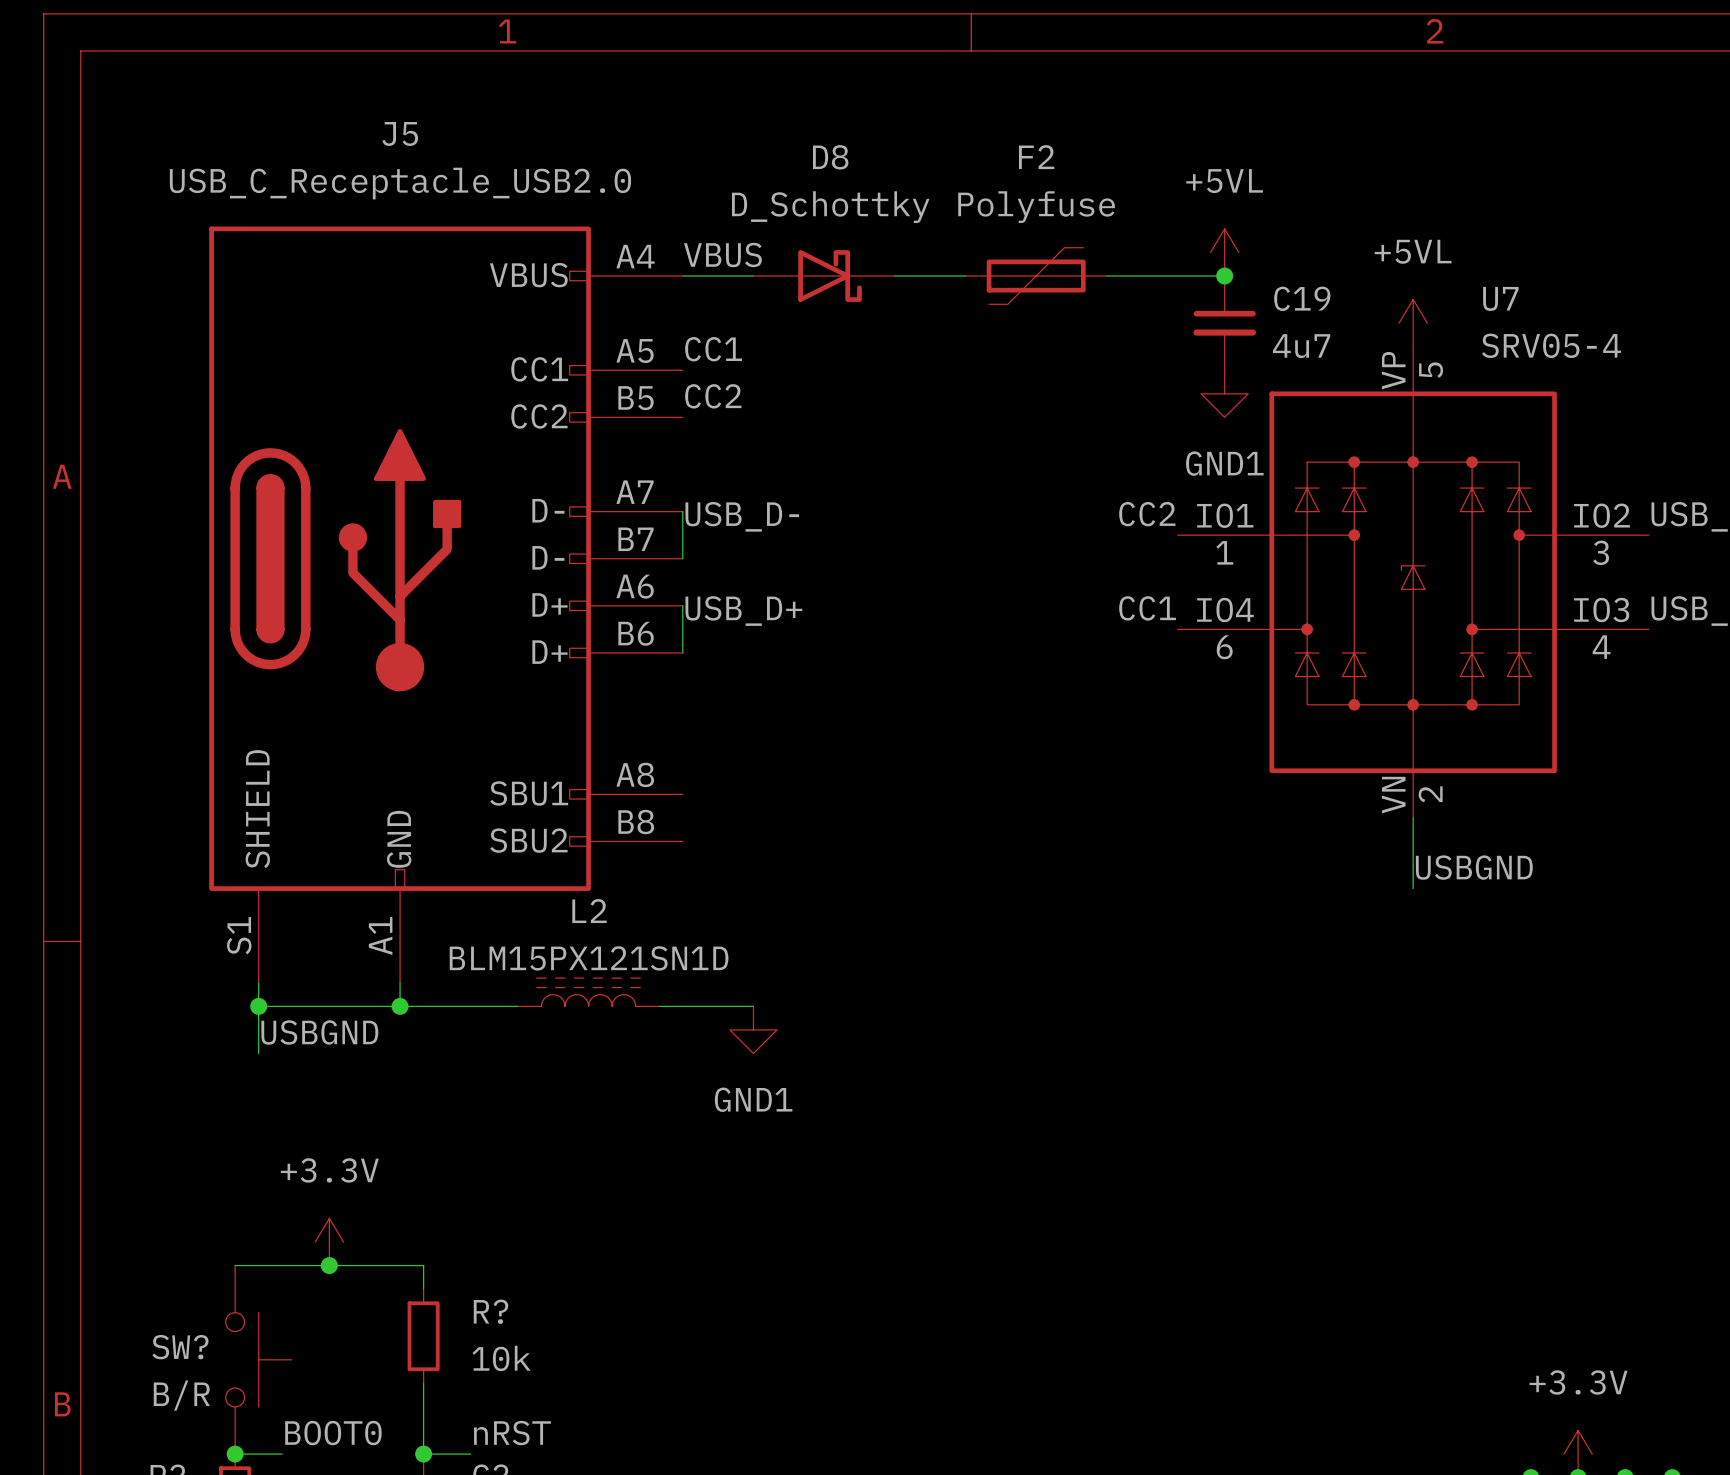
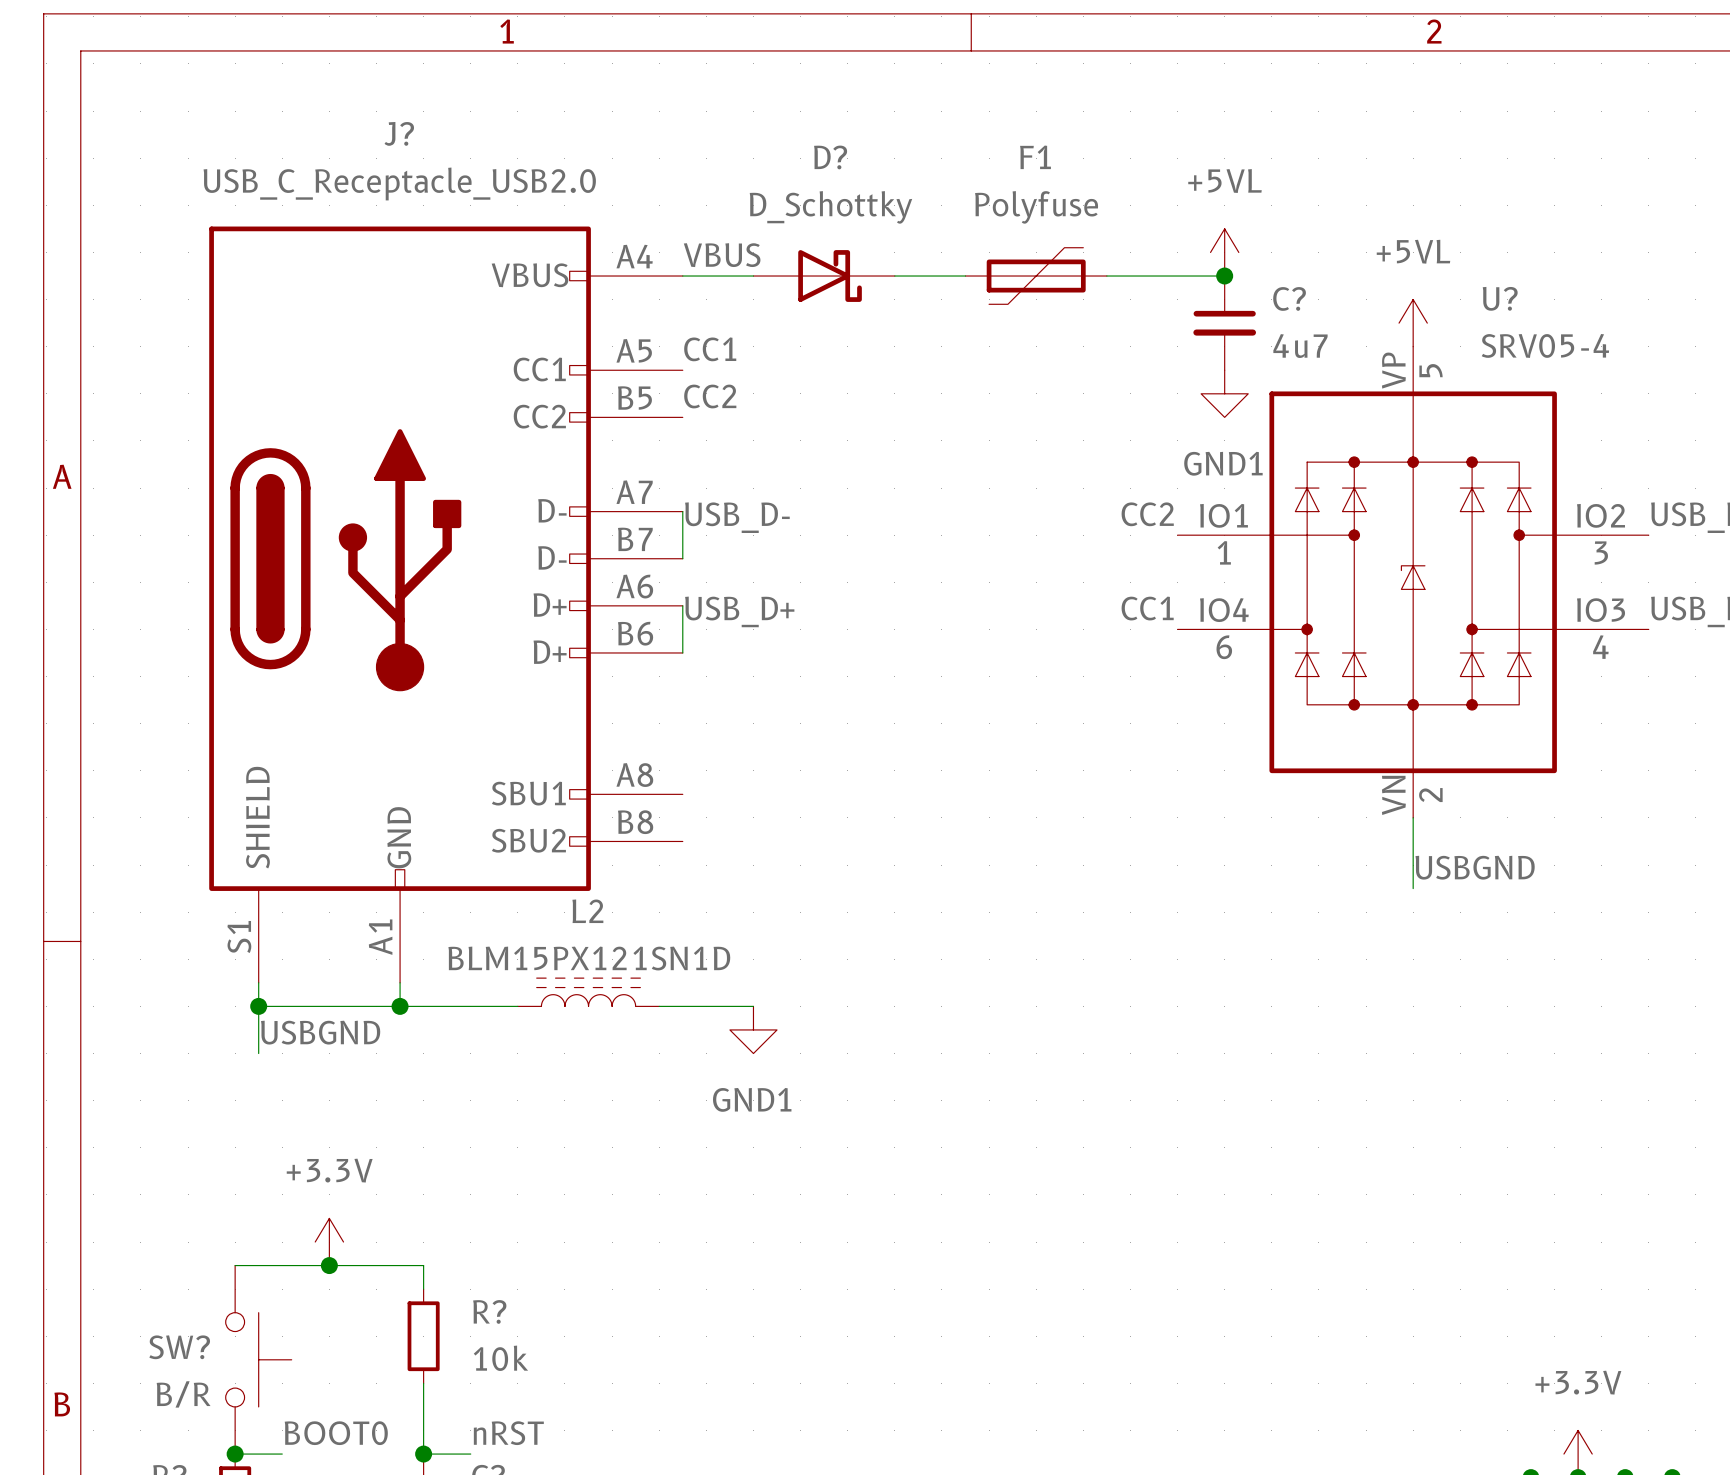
J5 name: J5 (400, 133) -> J? (399, 133)
D8 name: D8 (830, 157) -> D? (830, 157)
F2 name: F2 (1036, 157) -> F1 (1035, 157)
C19 name: C19 (1302, 298) -> C? (1289, 298)
U7 name: U7 (1500, 298) -> U? (1500, 298)

